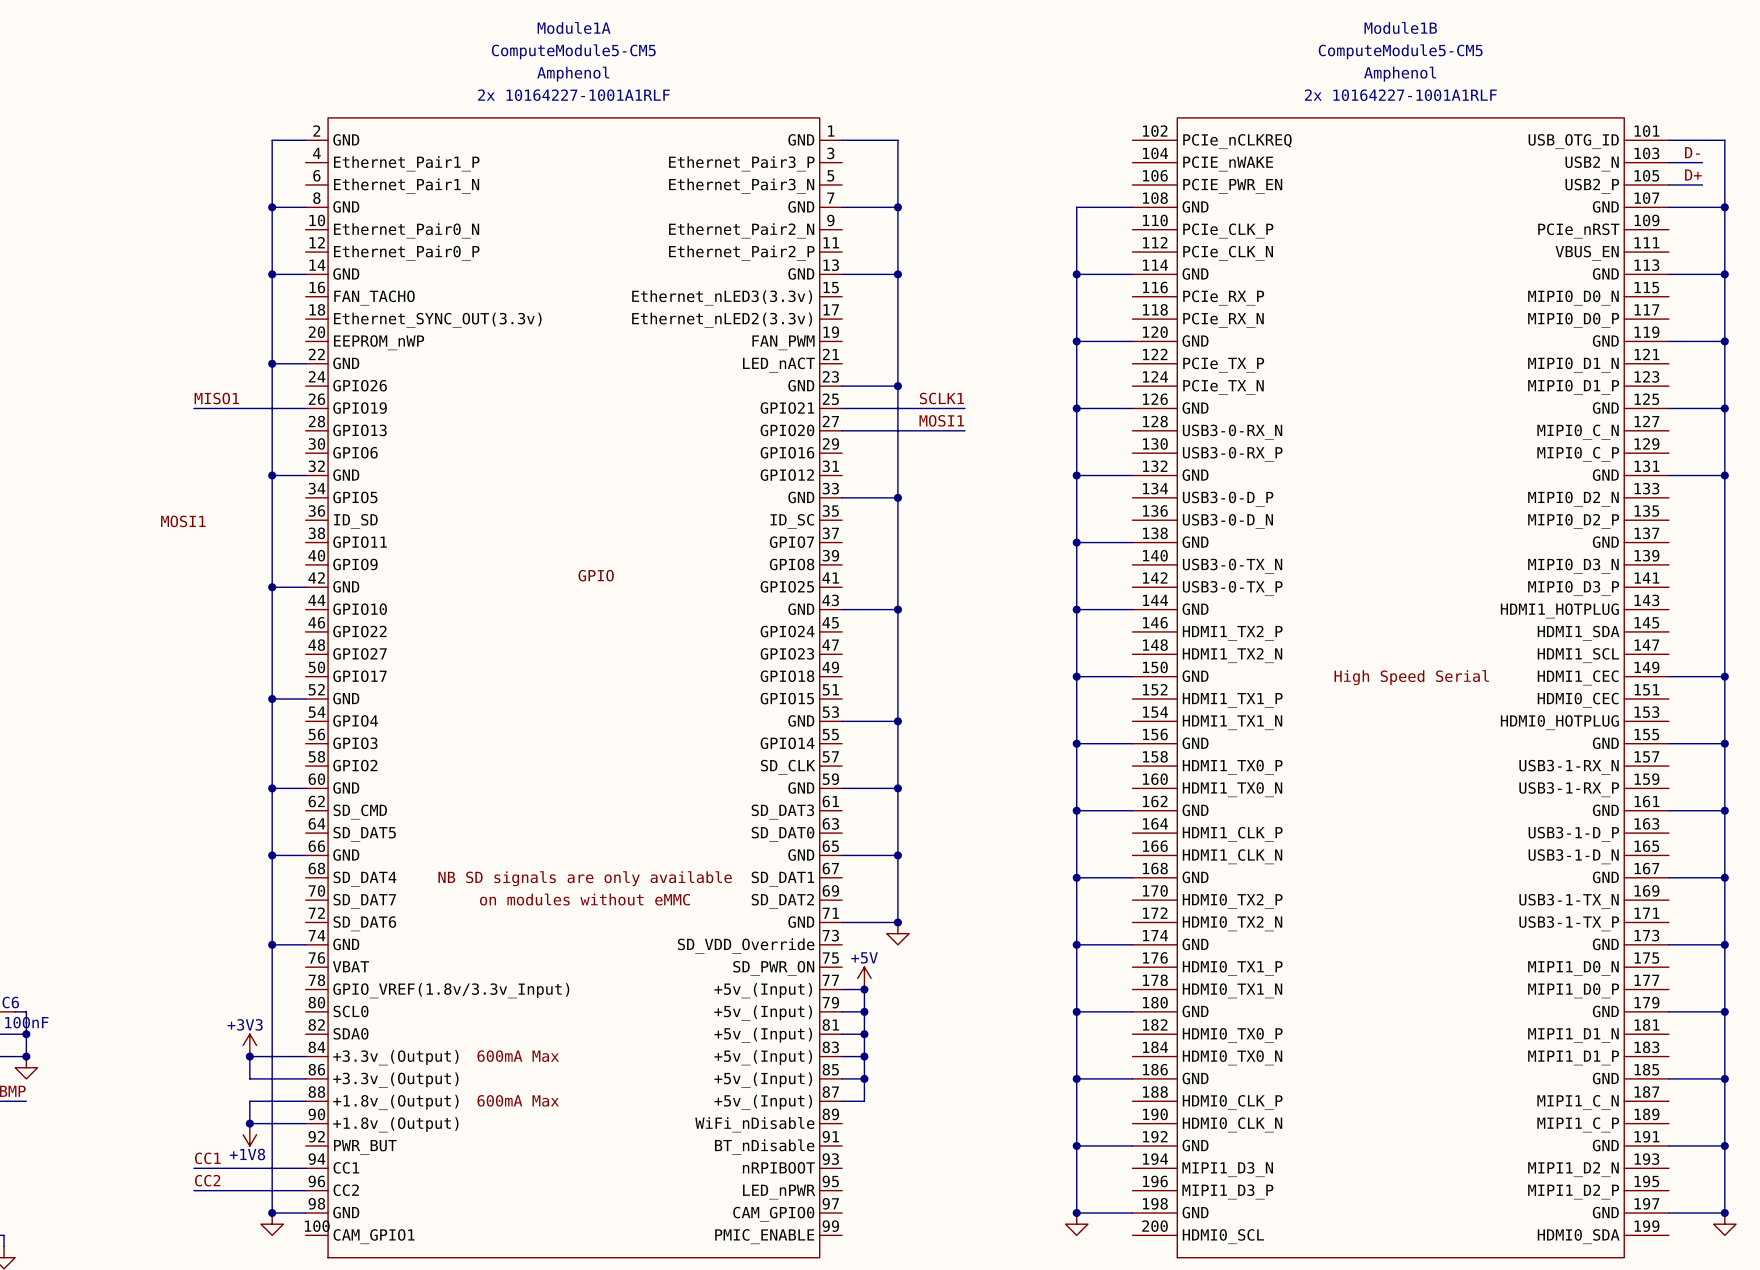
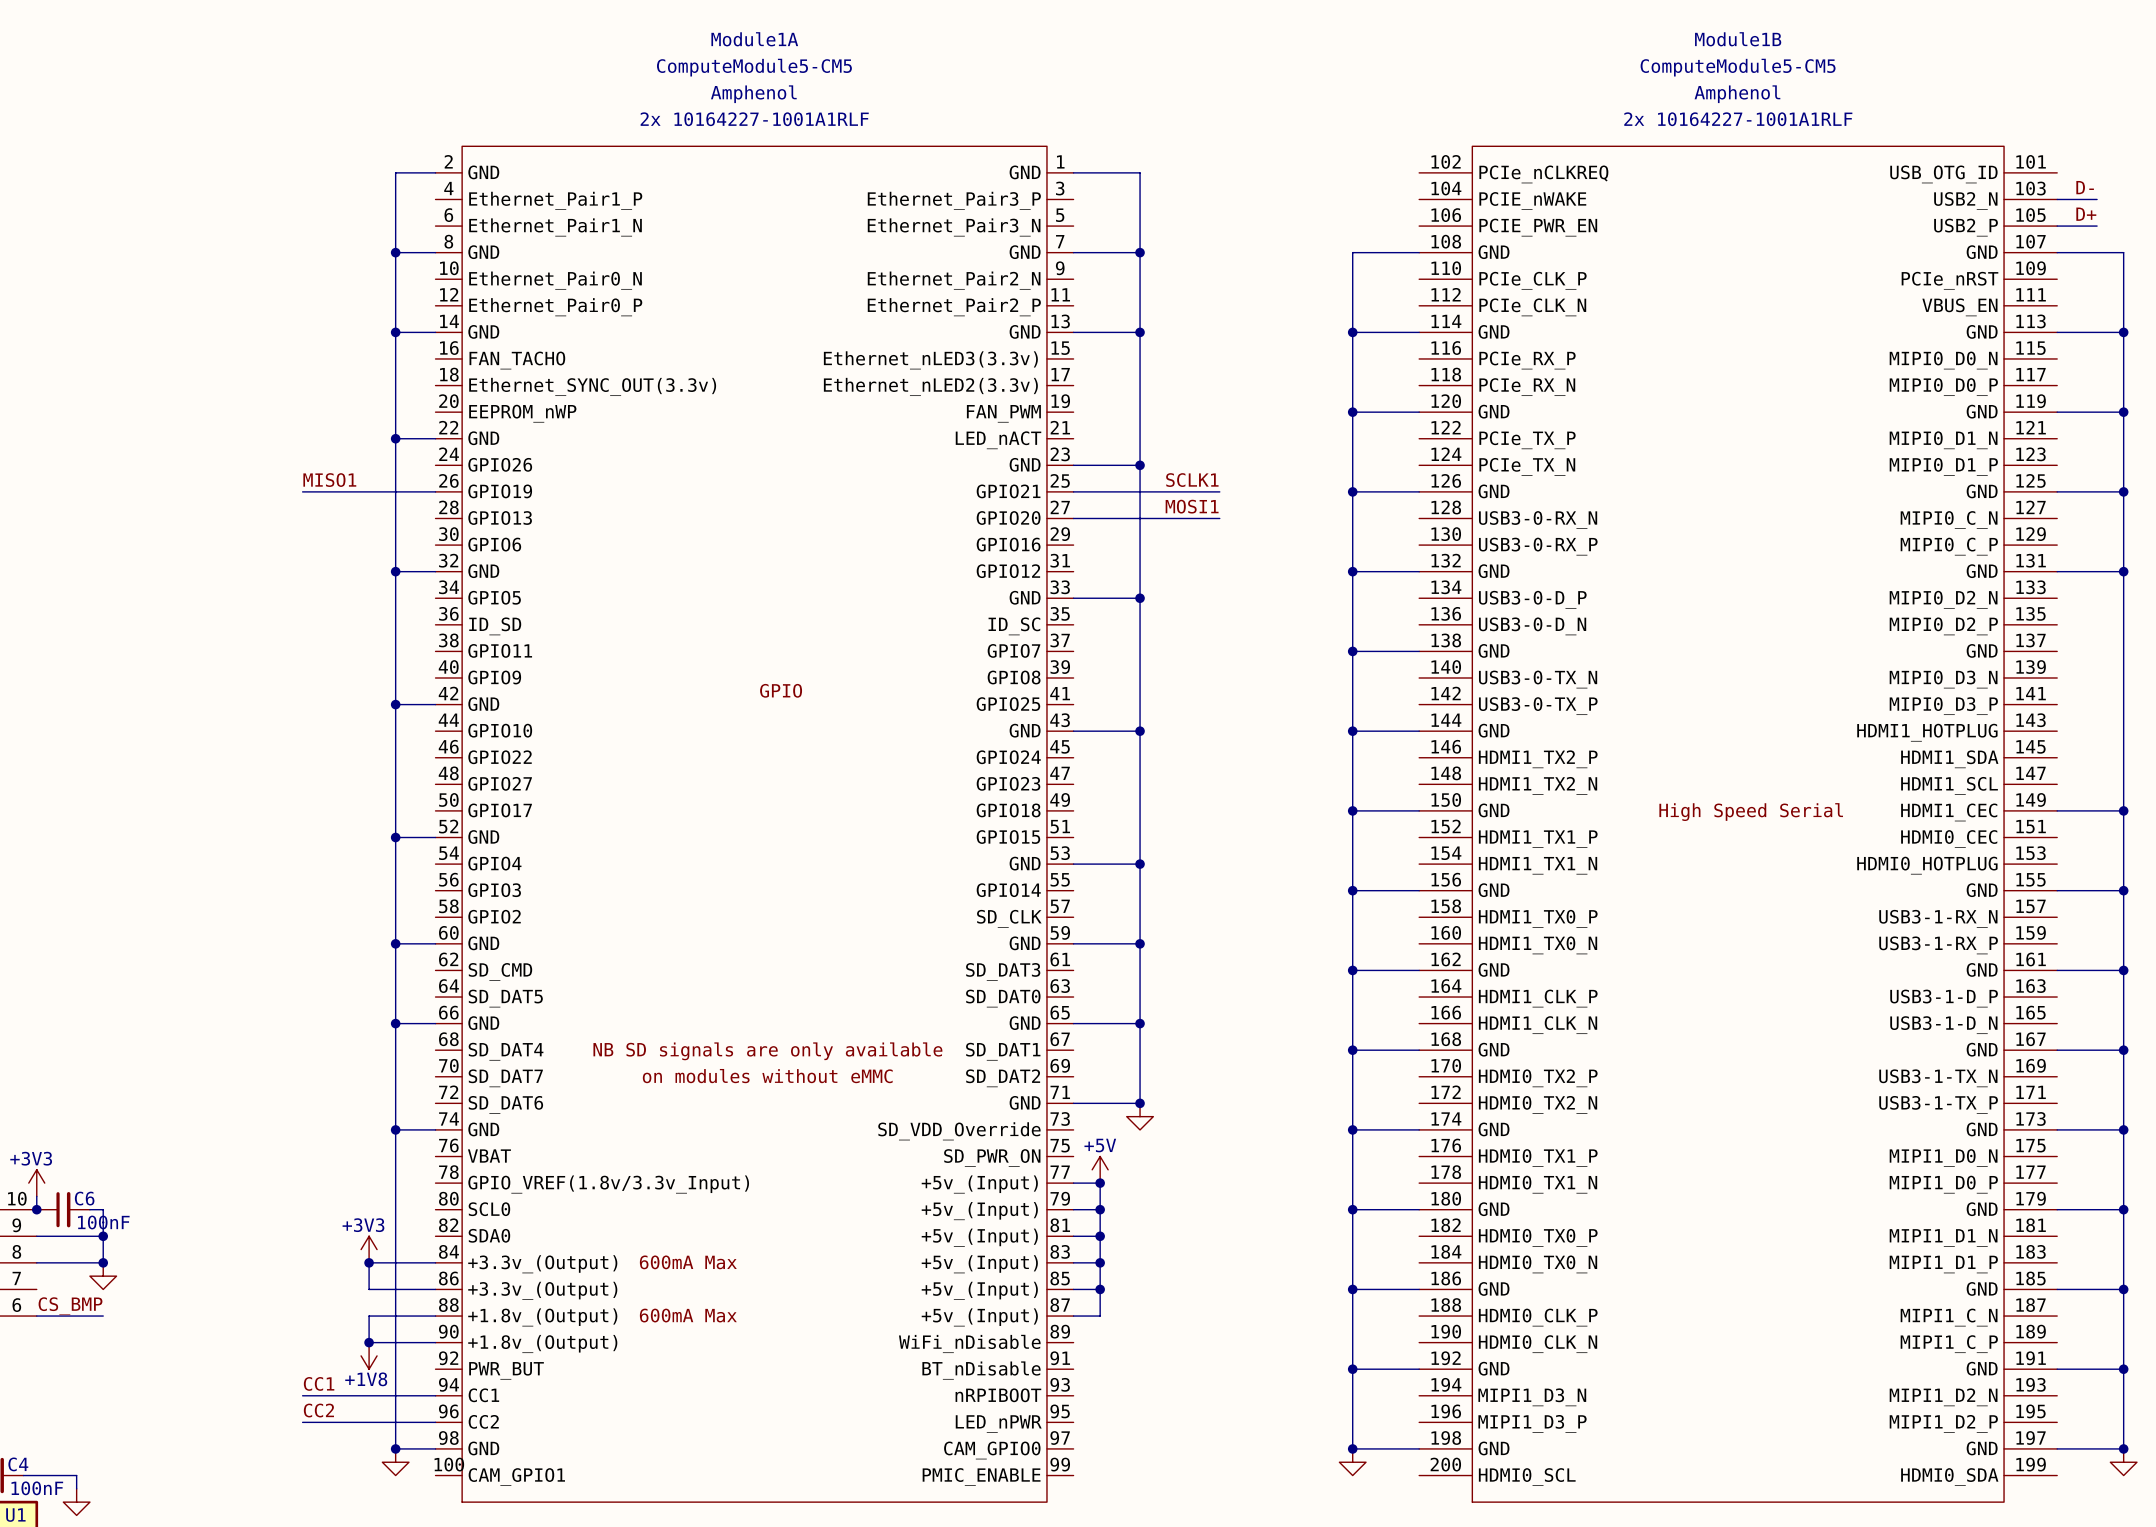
wire: (1668, 140) (1724, 140) (1724, 207) -> none
junction: (1724, 207) -> none
label: MOSI1 (183, 521) -> none

